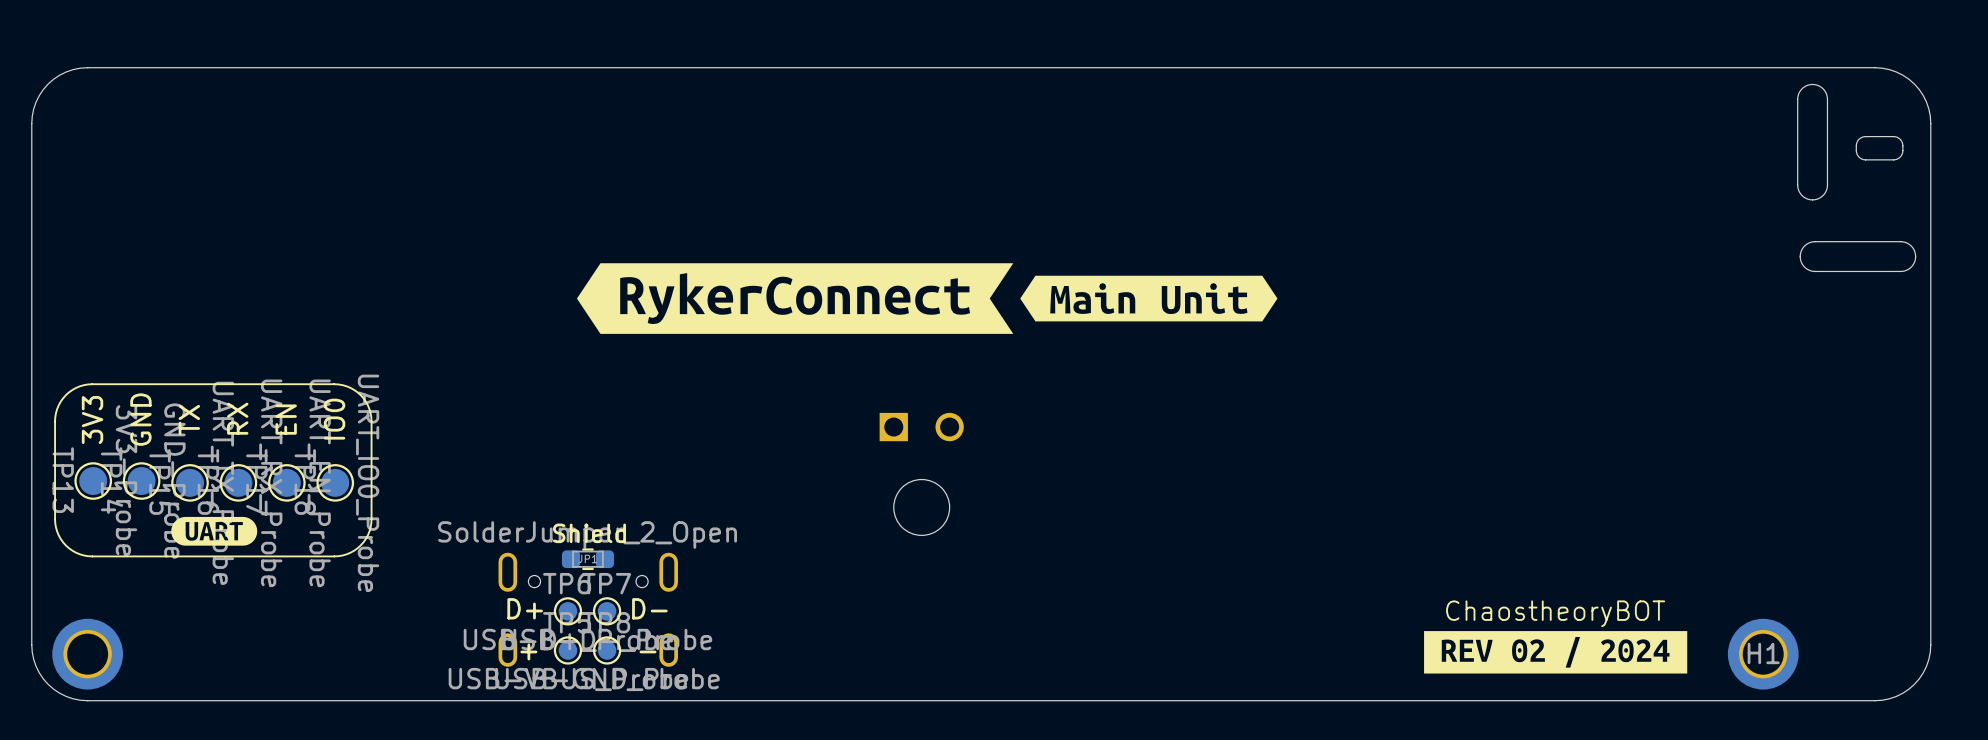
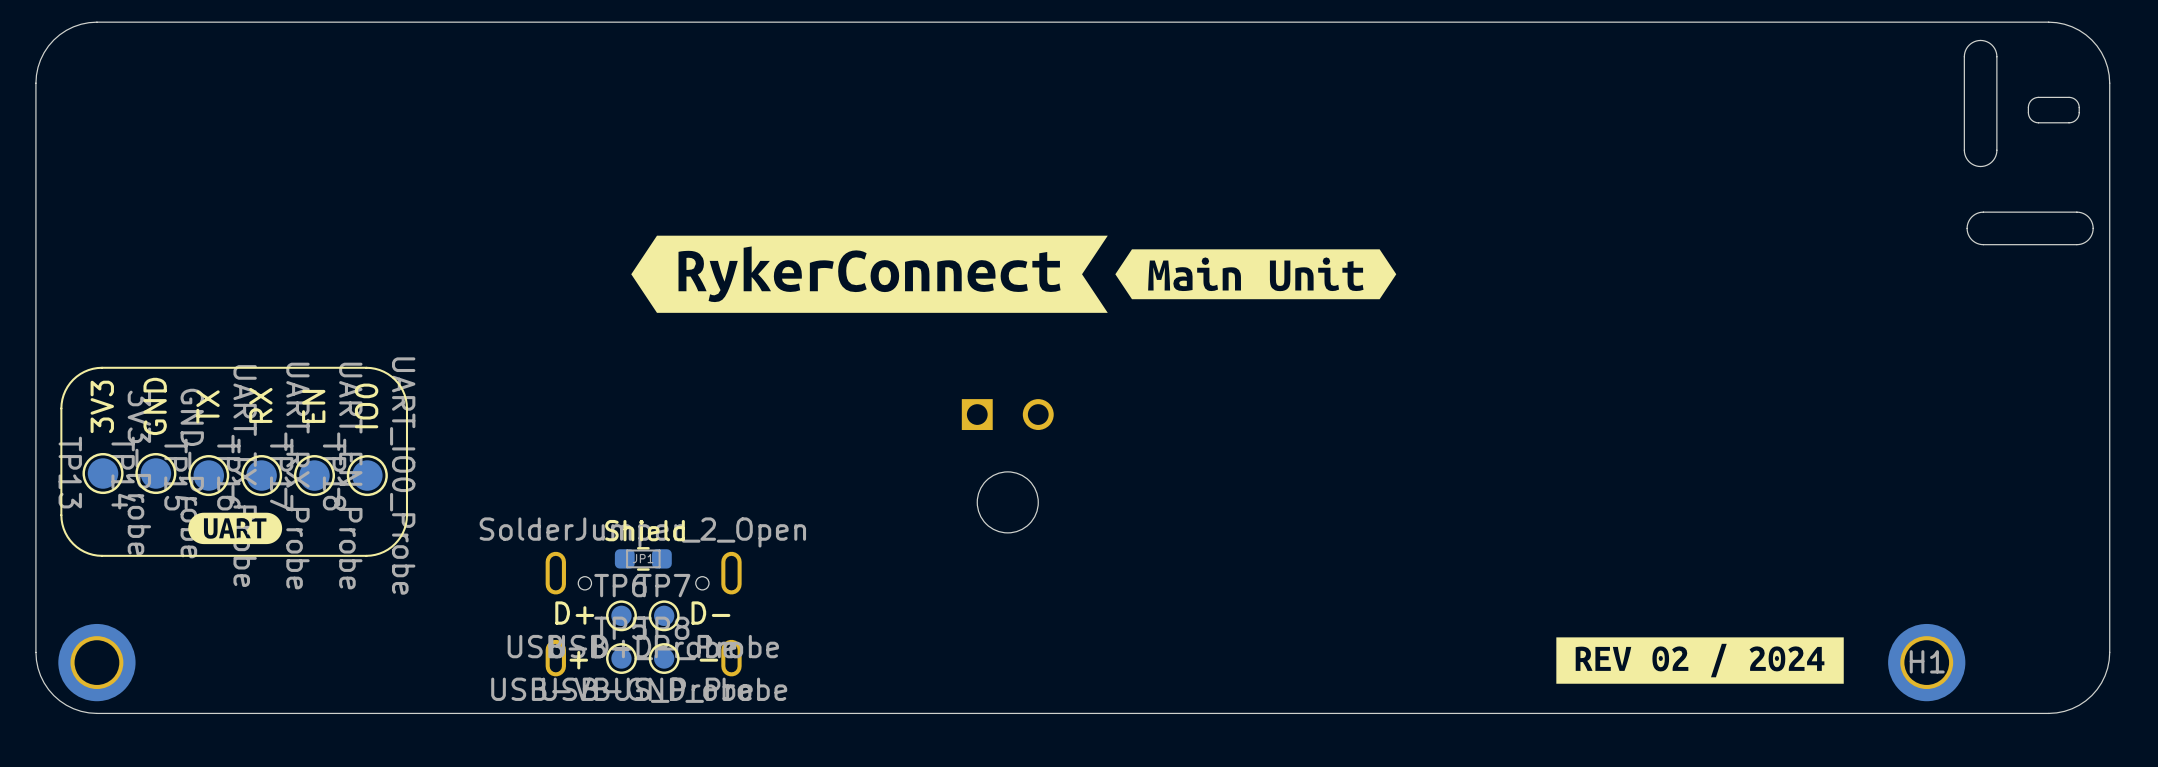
text: ChaostheoryBOT (1555, 613) -> none

